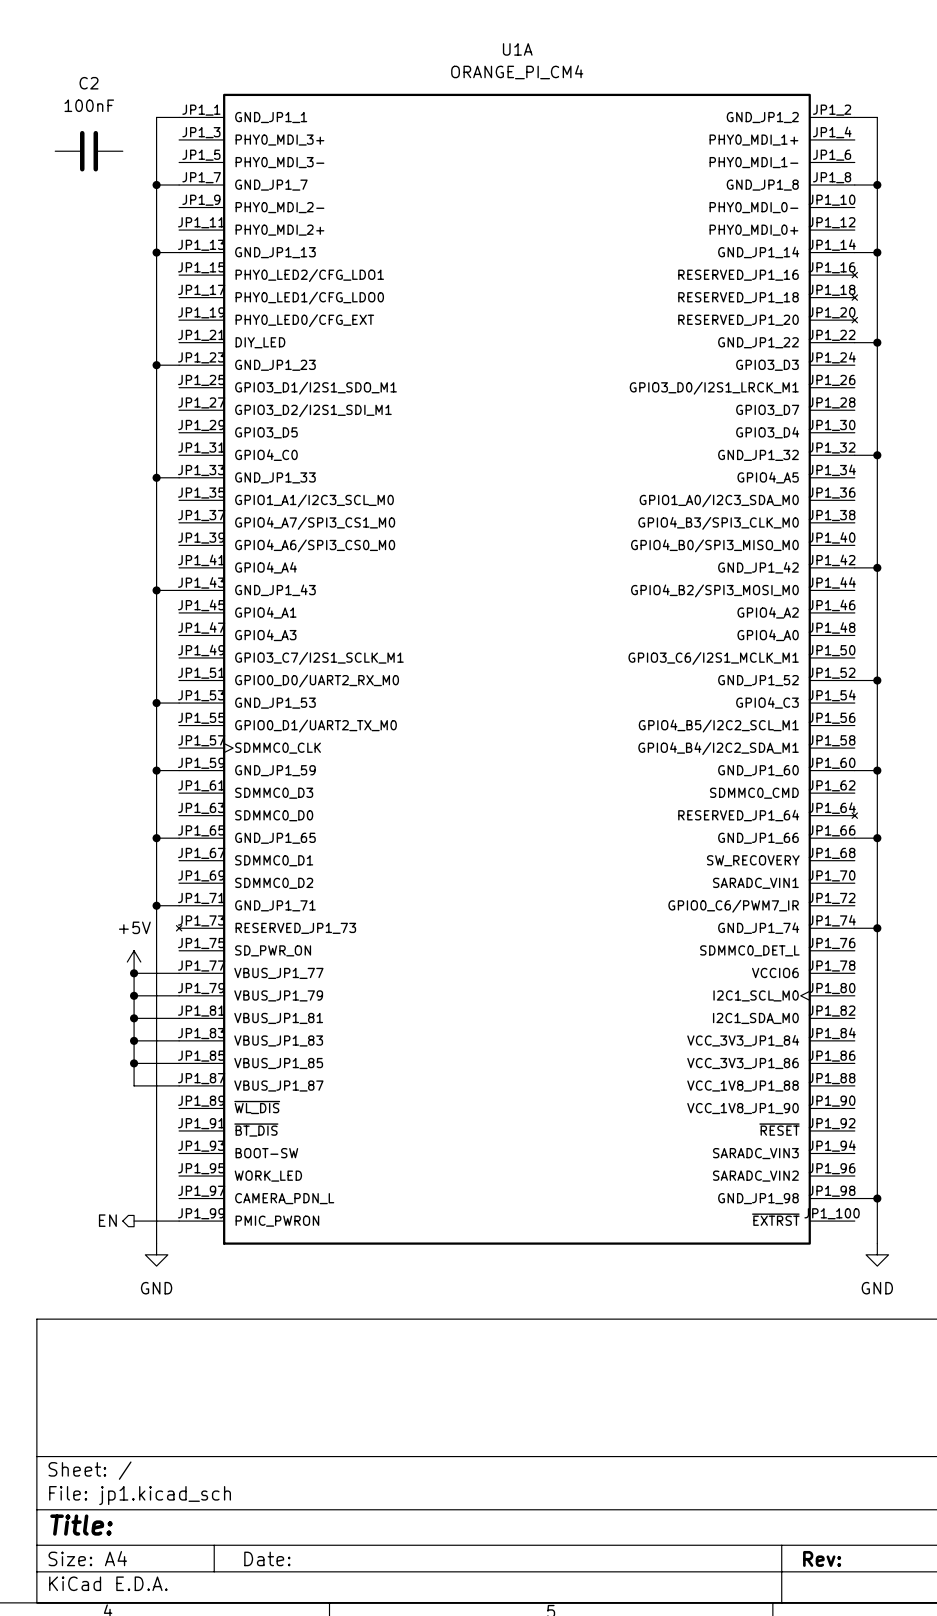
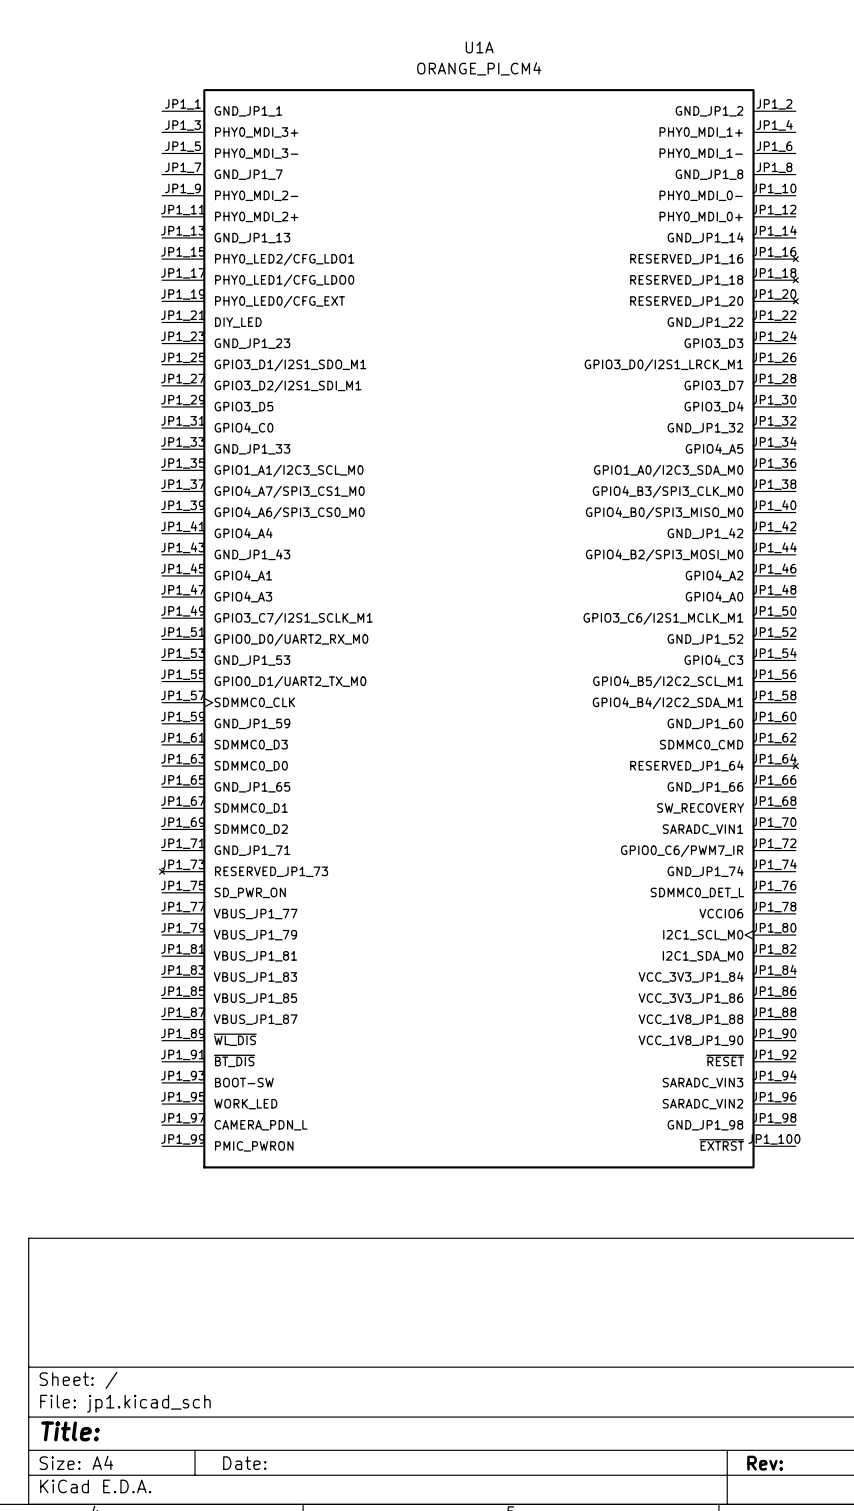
wire: (179, 117) (156, 117) (156, 1243) -> none
wire: (854, 117) (877, 117) (877, 1243) -> none
C2: 100nF (89, 151) -> none
wire: (156, 185) (179, 185) -> none
junction: (156, 185) -> none
wire: (854, 185) (877, 185) -> none
junction: (877, 185) -> none
wire: (156, 252) (179, 252) -> none
junction: (156, 252) -> none
wire: (854, 252) (877, 252) -> none
junction: (877, 252) -> none
wire: (854, 342) (877, 342) -> none
junction: (877, 342) -> none
wire: (156, 365) (179, 365) -> none
junction: (156, 365) -> none
wire: (854, 455) (877, 455) -> none
junction: (877, 455) -> none
wire: (156, 477) (179, 477) -> none
junction: (156, 477) -> none
wire: (854, 567) (877, 567) -> none
junction: (877, 567) -> none
wire: (156, 590) (179, 590) -> none
junction: (156, 590) -> none
wire: (854, 680) (877, 680) -> none
junction: (877, 680) -> none
wire: (156, 703) (179, 703) -> none
junction: (156, 703) -> none
wire: (156, 770) (179, 770) -> none
junction: (156, 770) -> none
wire: (854, 770) (877, 770) -> none
junction: (877, 770) -> none
wire: (156, 838) (179, 838) -> none
junction: (156, 838) -> none
wire: (854, 838) (877, 838) -> none
junction: (877, 838) -> none
wire: (156, 905) (179, 905) -> none
junction: (156, 905) -> none
wire: (854, 928) (877, 928) -> none
junction: (877, 928) -> none
power symbol: +5V (134, 962) -> none
junction: (134, 973) -> none
wire: (179, 973) (134, 973) (134, 1085) (179, 1085) -> none
wire: (134, 995) (179, 995) -> none
junction: (134, 995) -> none
wire: (134, 1018) (179, 1018) -> none
junction: (134, 1018) -> none
wire: (134, 1040) (179, 1040) -> none
junction: (134, 1040) -> none
wire: (134, 1063) (179, 1063) -> none
junction: (134, 1063) -> none
wire: (854, 1198) (877, 1198) -> none
junction: (877, 1198) -> none
hierarchical label: EN (107, 1220) -> none
wire: (134, 1221) (179, 1221) -> none
power symbol: GND (156, 1254) -> none
power symbol: GND (877, 1254) -> none

